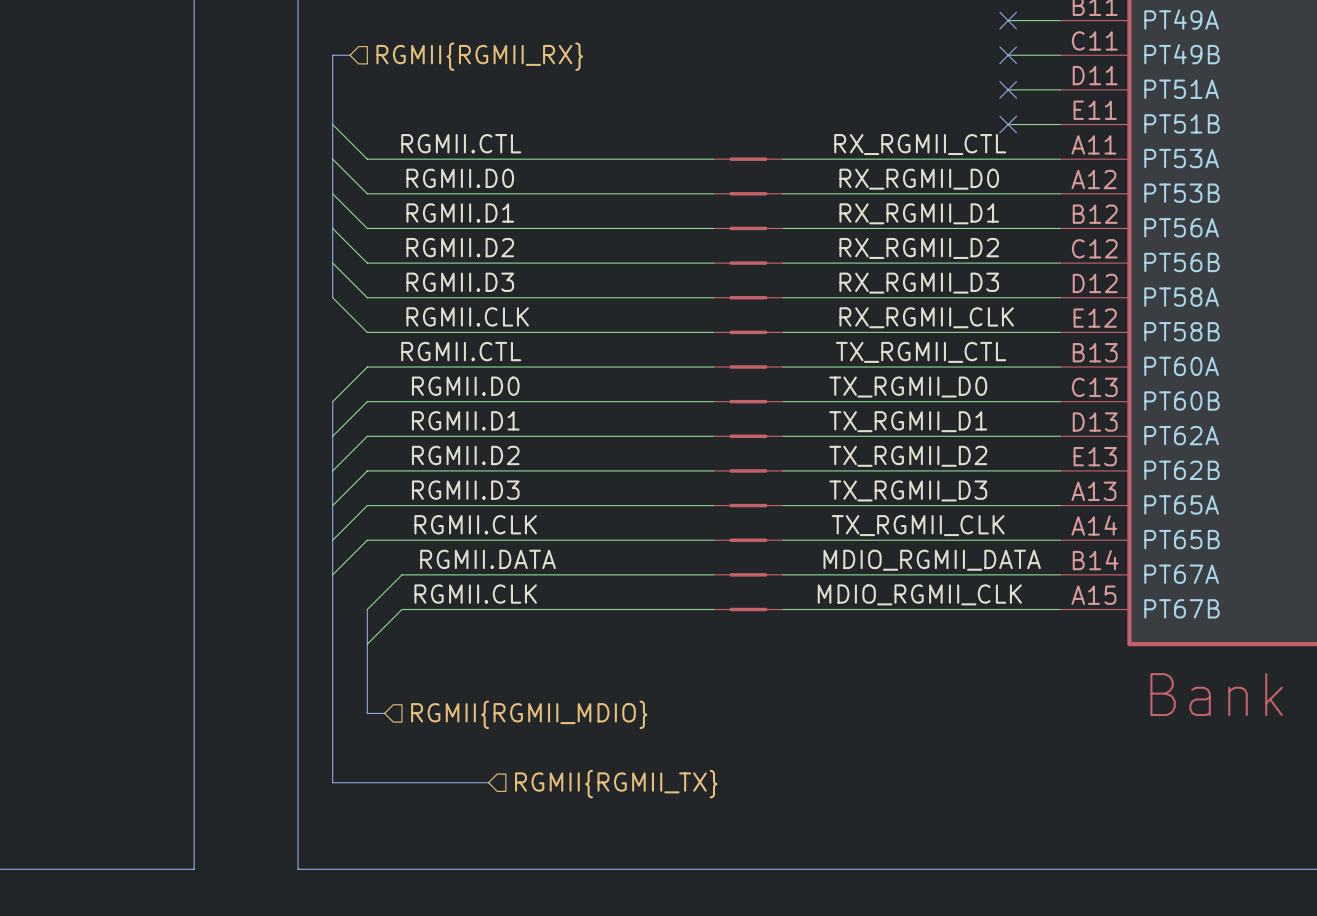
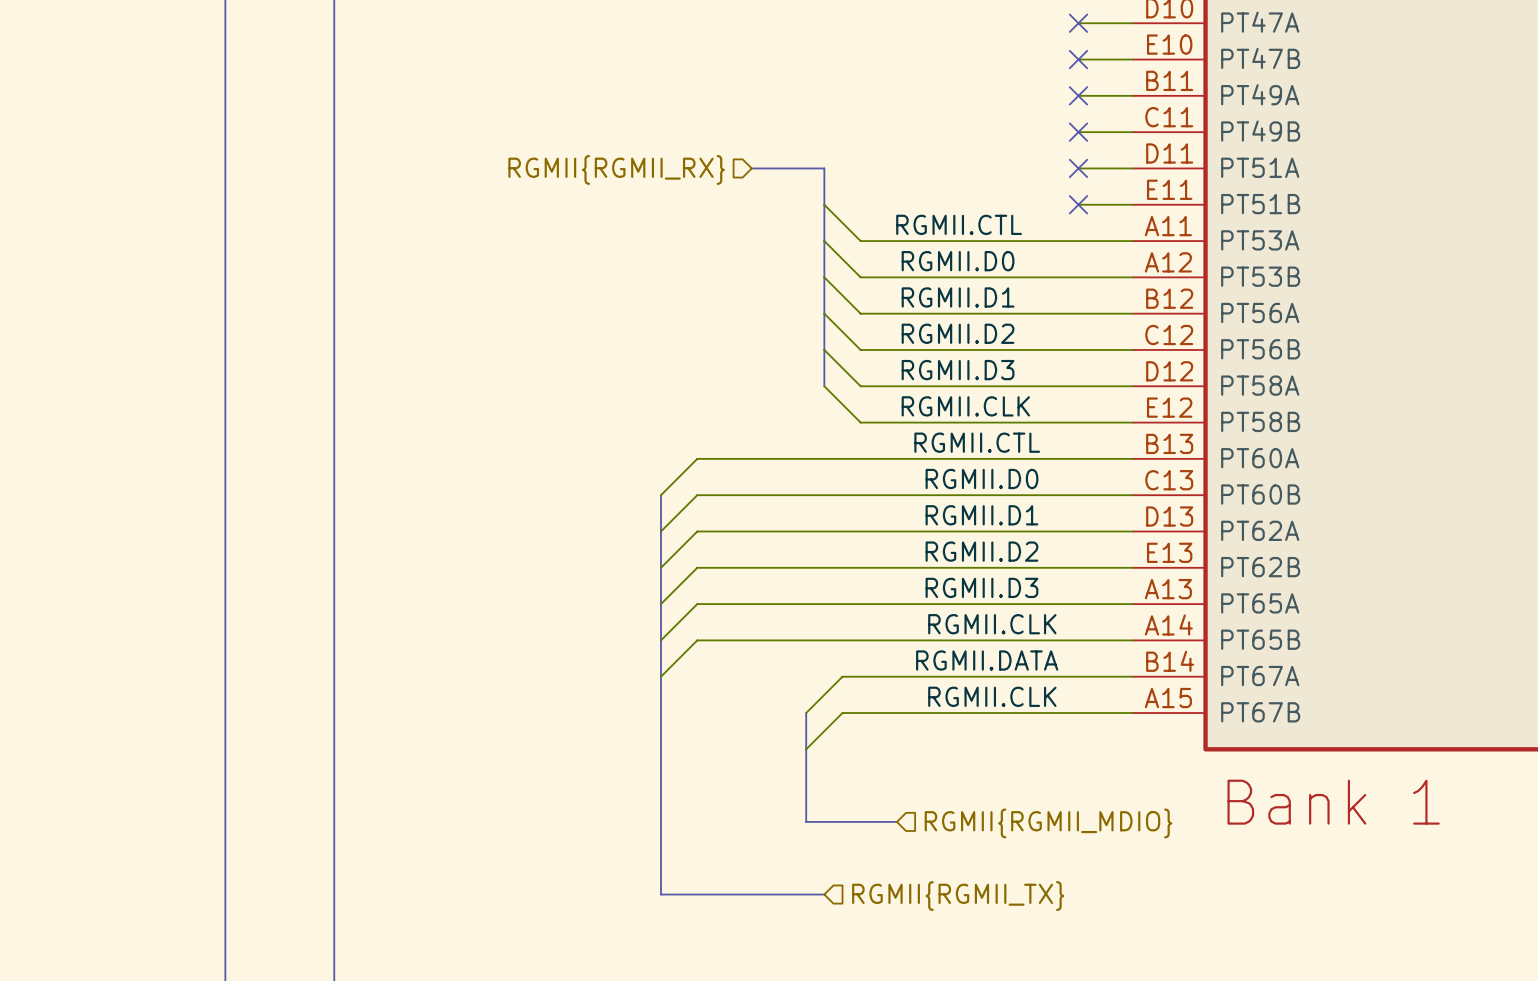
bus: (350, 55) (332, 55) (332, 297) -> none
hierarchical label rotation: 0° (479, 56) -> 180° (616, 169)
bus: none -> (751, 168) (824, 168) (824, 386)
wire: (332, 124) (367, 159) (713, 159) -> none
label: RGMII.CTL (461, 143) -> none
label: RX_RGMII_CTL (920, 144) -> RGMII.CTL (959, 224)
wire: (332, 159) (367, 193) (713, 193) -> none
part: (748, 159) -> none
wire: (783, 159) (800, 159) -> (824, 204) (860, 241)
label: RGMII.D0 (460, 178) -> none
label: RX_RGMII_D0 (919, 179) -> RGMII.D0 (958, 261)
wire: (332, 193) (367, 228) (713, 228) -> none
part: (748, 193) -> none
wire: (783, 193) (800, 193) -> (824, 241) (860, 277)
label: RGMII.D1 (460, 212) -> none
label: RX_RGMII_D1 (919, 213) -> RGMII.D1 (958, 297)
wire: (332, 228) (367, 263) (713, 263) -> none
part: (748, 228) -> none
wire: (783, 228) (800, 228) -> (824, 277) (860, 313)
label: RGMII.D2 (460, 247) -> none
label: RX_RGMII_D2 (919, 248) -> RGMII.D2 (958, 333)
wire: (332, 263) (367, 297) (713, 297) -> none
part: (748, 263) -> none
wire: (783, 263) (800, 263) -> (824, 313) (860, 349)
label: RGMII.D3 (460, 282) -> none
label: RX_RGMII_D3 (919, 283) -> RGMII.D3 (958, 370)
wire: (332, 297) (367, 332) (713, 332) -> none
part: (748, 297) -> none
wire: (783, 297) (800, 297) -> (824, 349) (860, 386)
label: RGMII.CLK (467, 316) -> none
label: RX_RGMII_CLK (926, 317) -> RGMII.CLK (965, 406)
part: (748, 332) -> none
wire: (783, 332) (800, 332) -> (824, 386) (860, 422)
label: RGMII.CTL (461, 351) -> none
label: TX_RGMII_CTL (921, 352) -> RGMII.CTL (977, 442)
wire: (644, 367) (367, 367) (332, 401) -> (697, 458) (660, 495)
part: (748, 367) -> none
label: RGMII.D0 (465, 386) -> none
label: TX_RGMII_D0 (908, 387) -> RGMII.D0 (981, 478)
bus: (332, 401) (332, 782) (488, 782) -> (660, 495) (660, 894) (824, 894)
wire: (644, 401) (367, 401) (332, 436) -> (697, 495) (660, 531)
part: (748, 401) -> none
label: RGMII.D1 (465, 420) -> none
label: TX_RGMII_D1 (908, 421) -> RGMII.D1 (981, 515)
wire: (644, 436) (367, 436) (332, 470) -> (697, 531) (660, 567)
part: (748, 436) -> none
label: RGMII.D2 (465, 455) -> none
label: TX_RGMII_D2 (908, 456) -> RGMII.D2 (981, 551)
wire: (644, 470) (367, 470) (332, 505) -> (697, 567) (660, 604)
part: (748, 470) -> none
label: RGMII.D3 (465, 490) -> none
label: TX_RGMII_D3 (908, 490) -> RGMII.D3 (981, 587)
wire: (644, 505) (367, 505) (332, 540) -> (697, 604) (660, 640)
part: (748, 505) -> none
label: RGMII.CLK (475, 524) -> none
label: TX_RGMII_CLK (918, 525) -> RGMII.CLK (992, 624)
wire: (644, 540) (367, 540) (332, 574) -> (697, 640) (660, 676)
part: (748, 540) -> none
label: RGMII.DATA (488, 559) -> none
label: MDIO_RGMII_DATA (932, 560) -> RGMII.DATA (987, 660)
wire: (713, 574) (401, 574) (367, 609) -> none
part: (748, 574) -> none
wire: none -> (842, 676) (806, 713)
label: RGMII.CLK (475, 594) -> none
label: MDIO_RGMII_CLK (919, 594) -> RGMII.CLK (992, 696)
bus: (367, 609) (367, 713) (384, 713) -> none
wire: (713, 609) (401, 609) (367, 644) -> none
bus: none -> (806, 713) (806, 821) (896, 821)
part: (748, 609) -> none
wire: none -> (842, 713) (806, 749)
hierarchical label: RGMII{RGMII_MDIO} (529, 714) -> none
hierarchical label: none -> RGMII{RGMII_MDIO} (1048, 823)
hierarchical label position: RGMII{RGMII_TX} (616, 784) -> RGMII{RGMII_TX} (958, 896)

